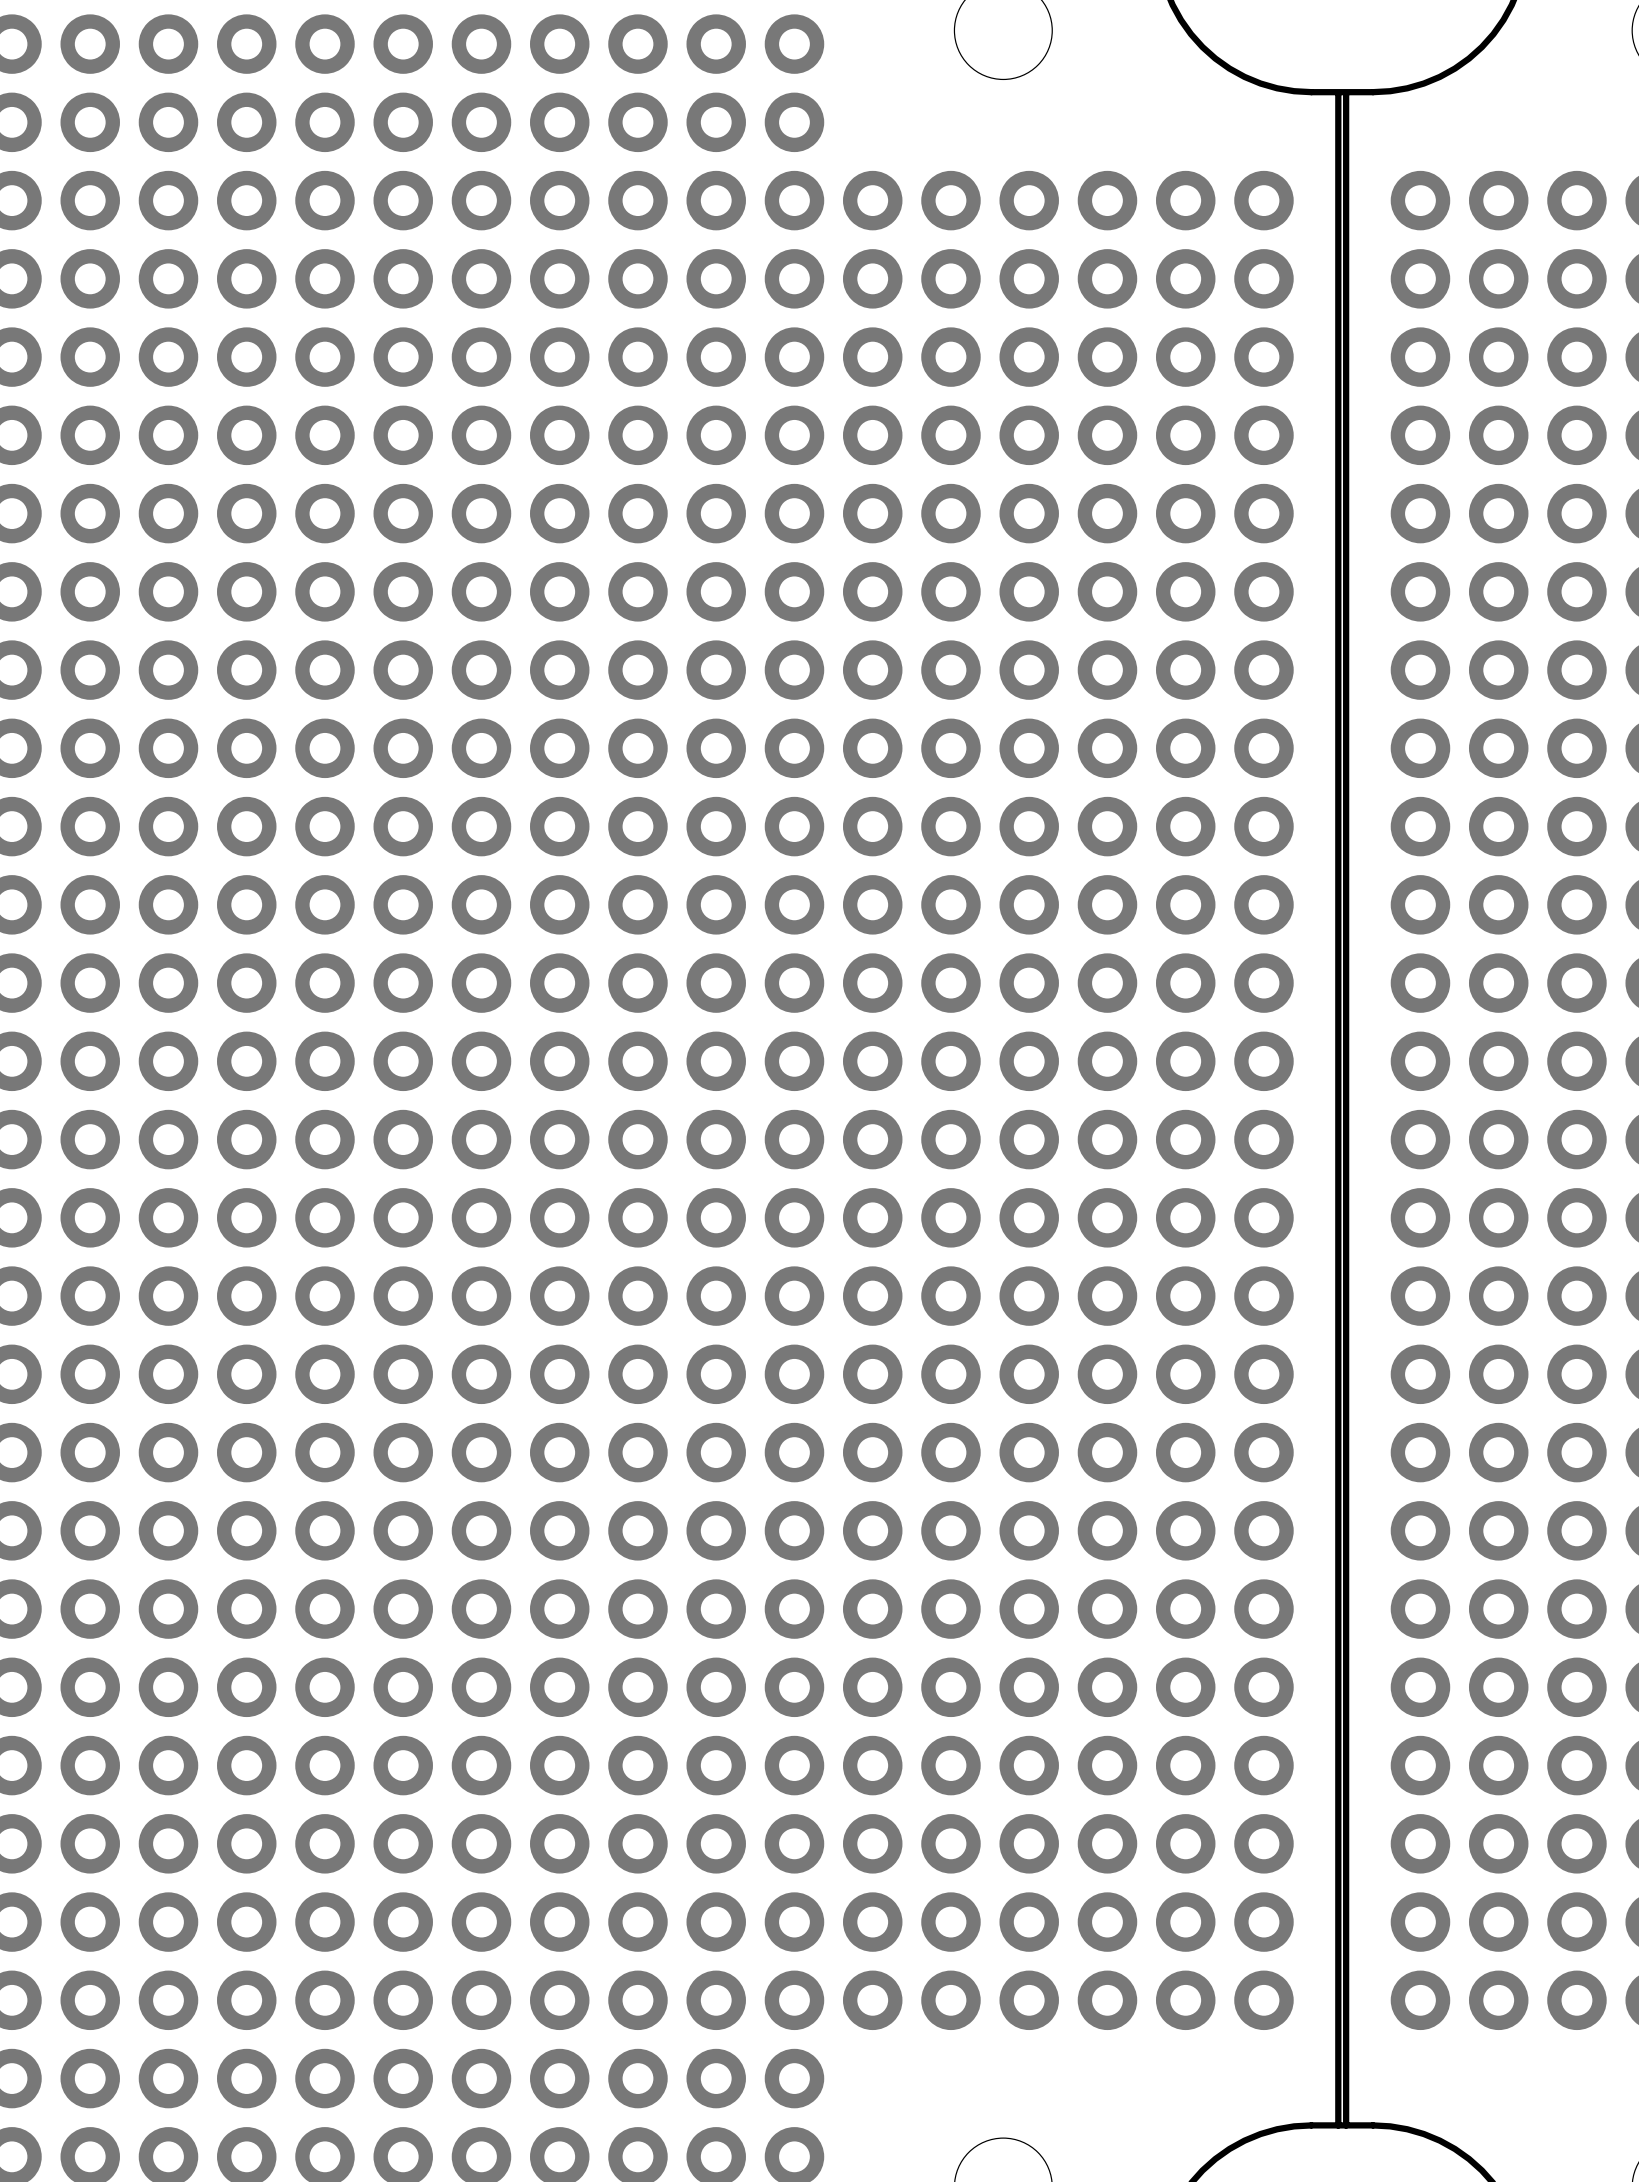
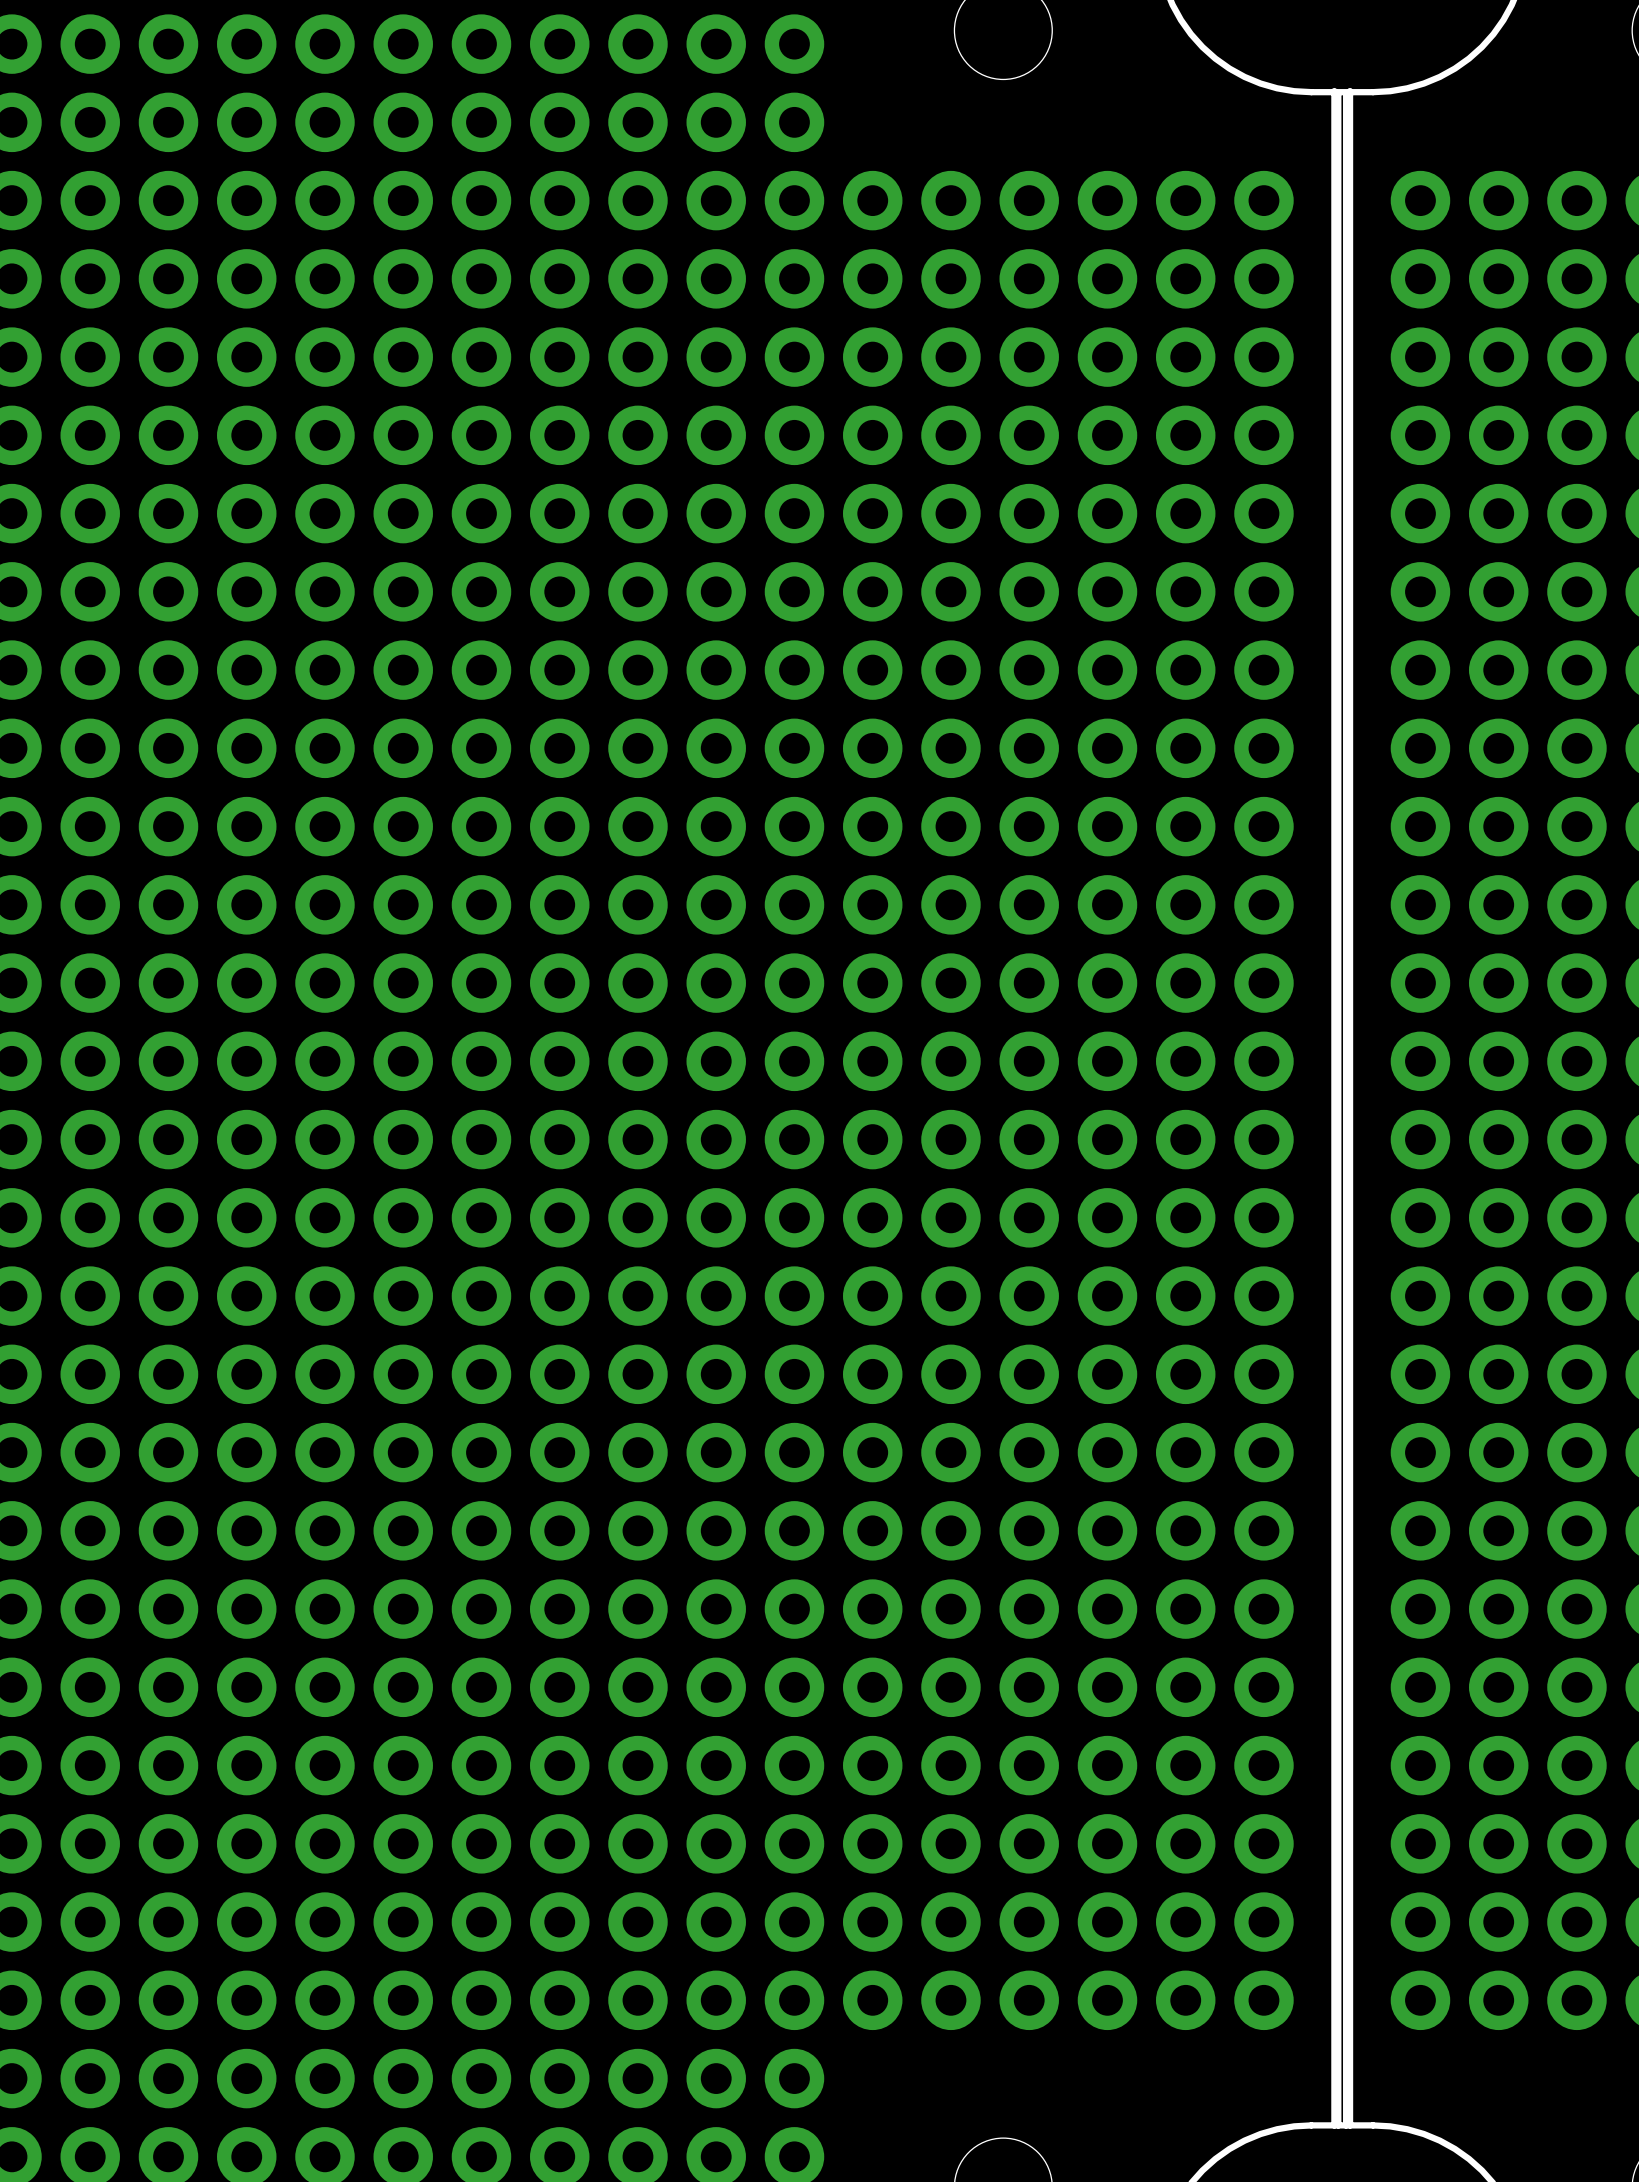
board edge: none -> (1334, 91) (1334, 2125)
board edge: none -> (1350, 91) (1350, 2125)

